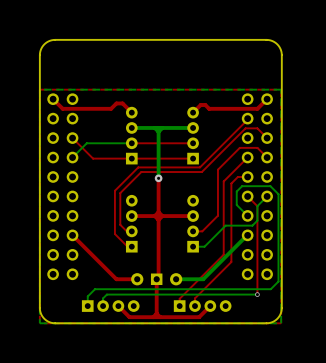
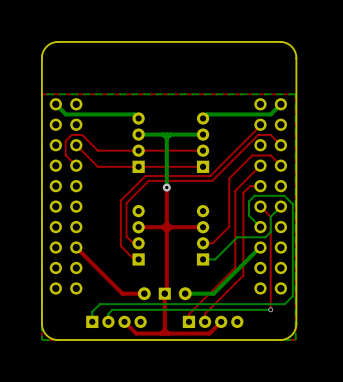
bottom track: none -> (55, 104) (65, 114) (134, 114) (138, 118)
top track: (53, 99) (62, 108) (111, 108) (116, 103) (122, 103) (131, 112) -> none
bottom track: none -> (280, 104) (270, 114) (207, 114) (203, 118)
top track: (267, 99) (257, 108) (209, 108) (205, 104) (200, 104) (193, 112) -> none
bottom track: (131, 143) (86, 143) (72, 157) -> none
top track: none -> (138, 150) (97, 150) (82, 134) (71, 134) (65, 141) (65, 155) (76, 165)

